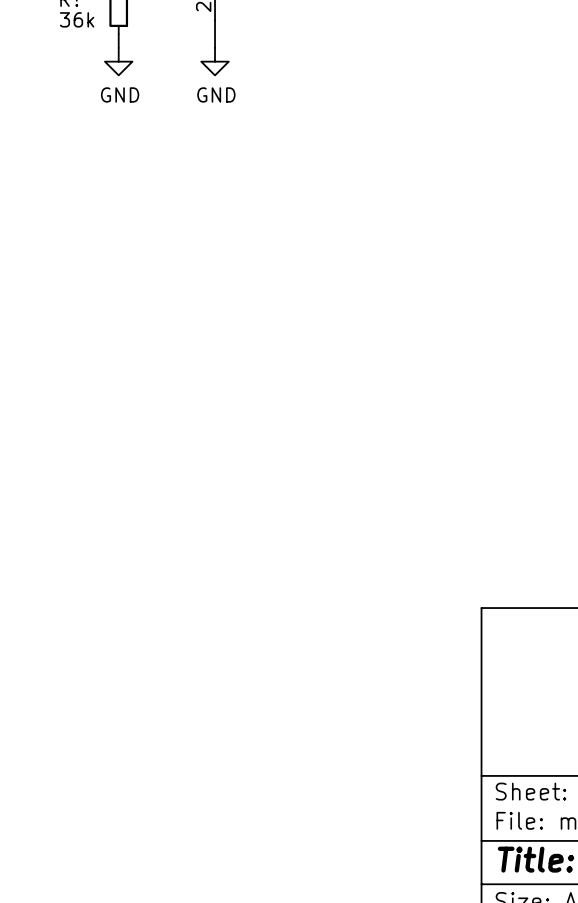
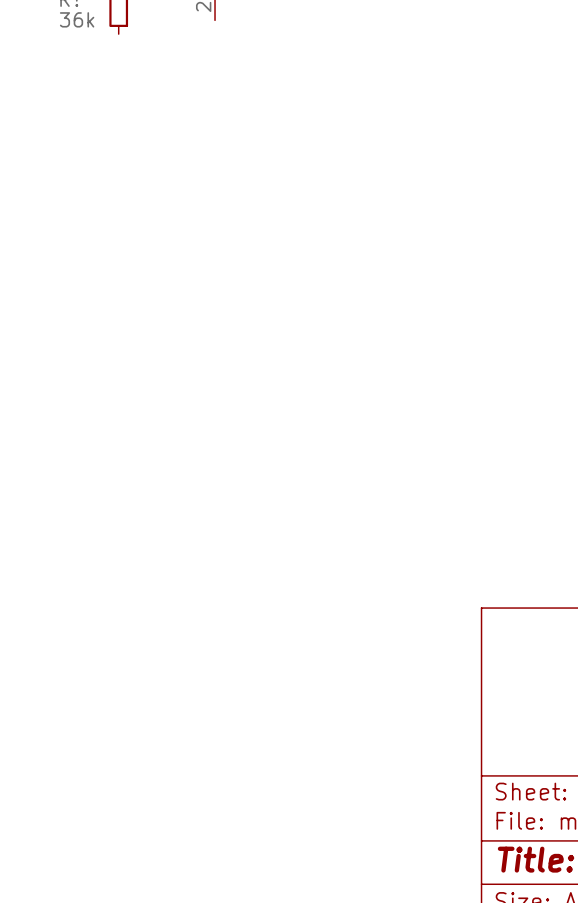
wire: (215, 20) (215, 47) -> none
wire: (118, 34) (118, 47) -> none
power symbol: GND (118, 61) -> none
power symbol: GND (215, 61) -> none

